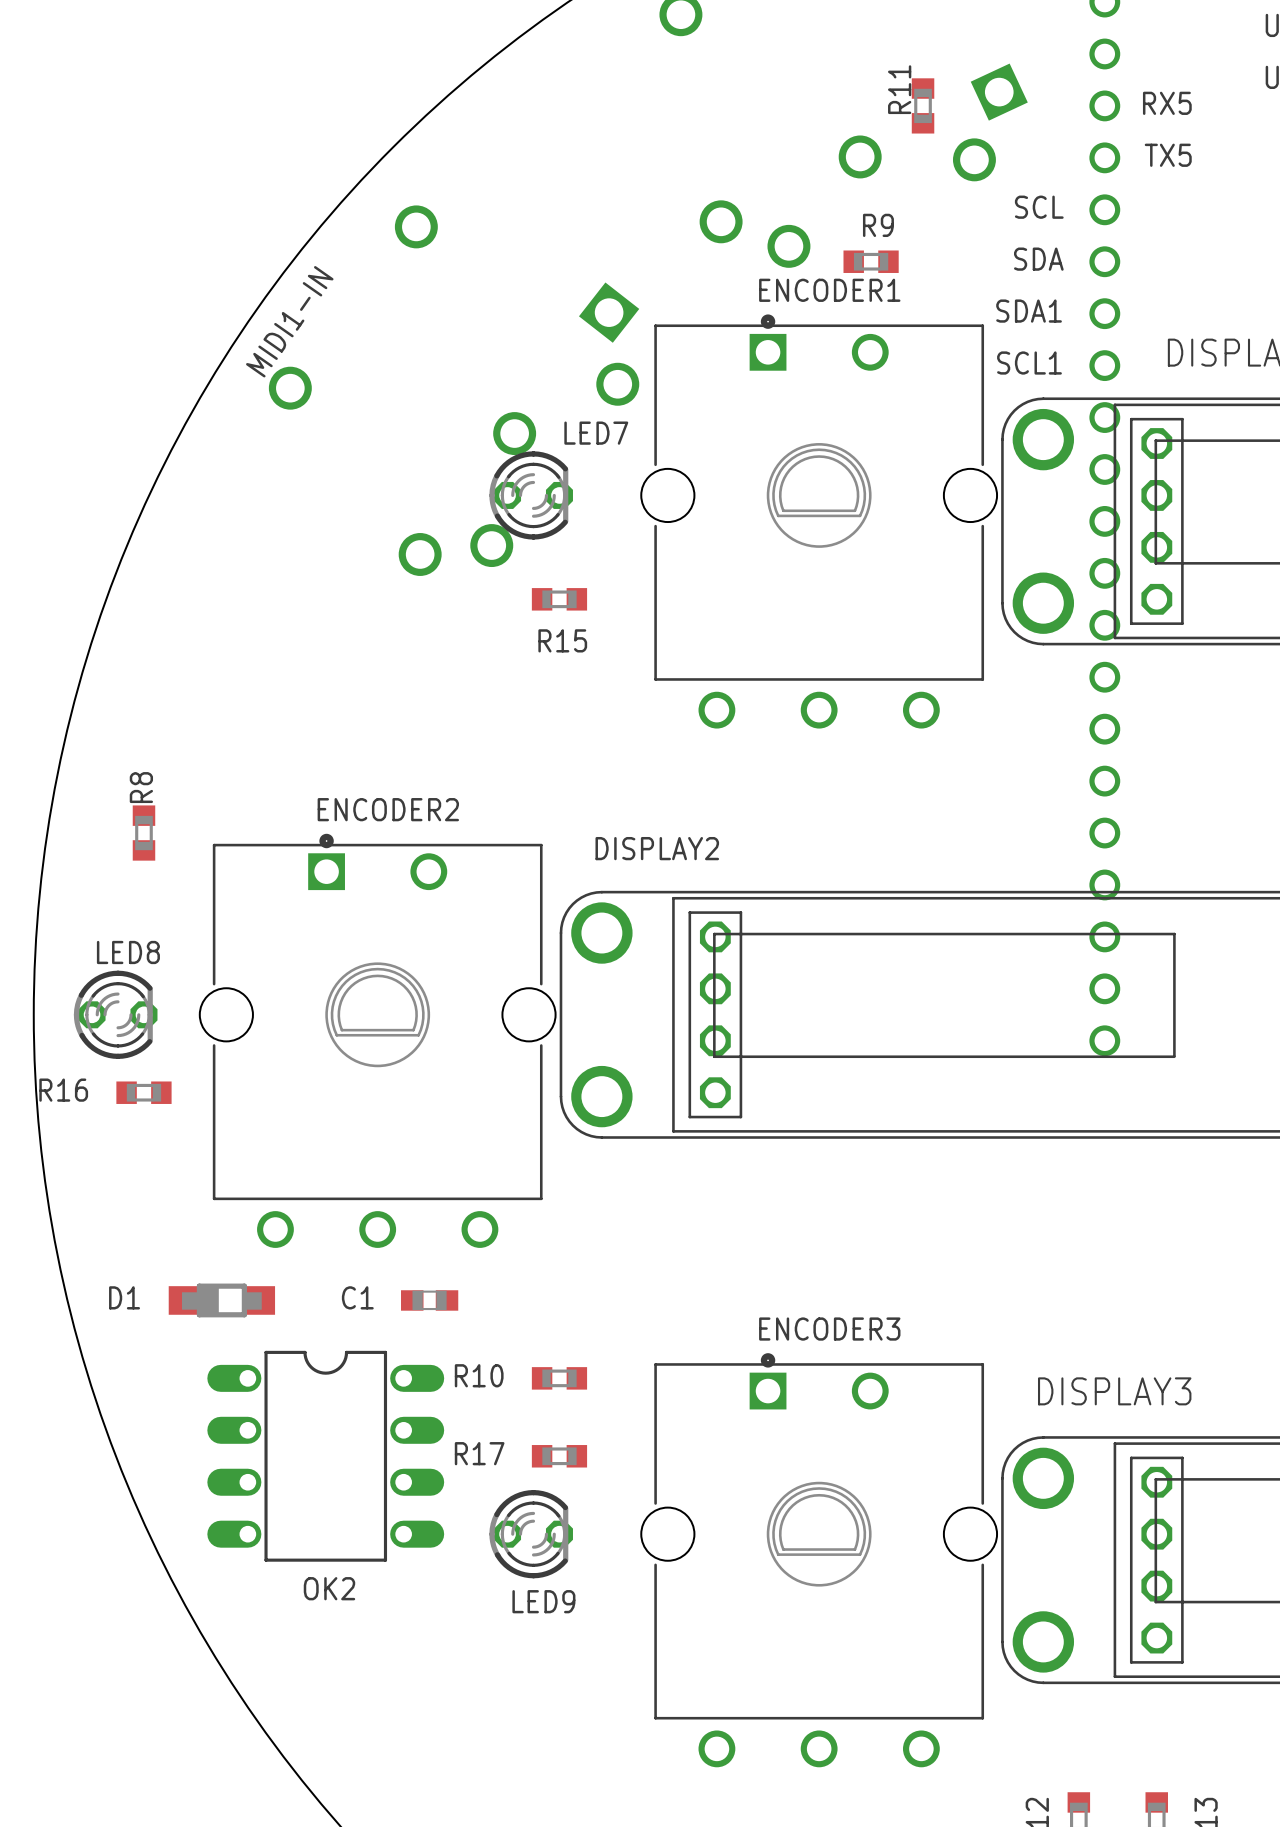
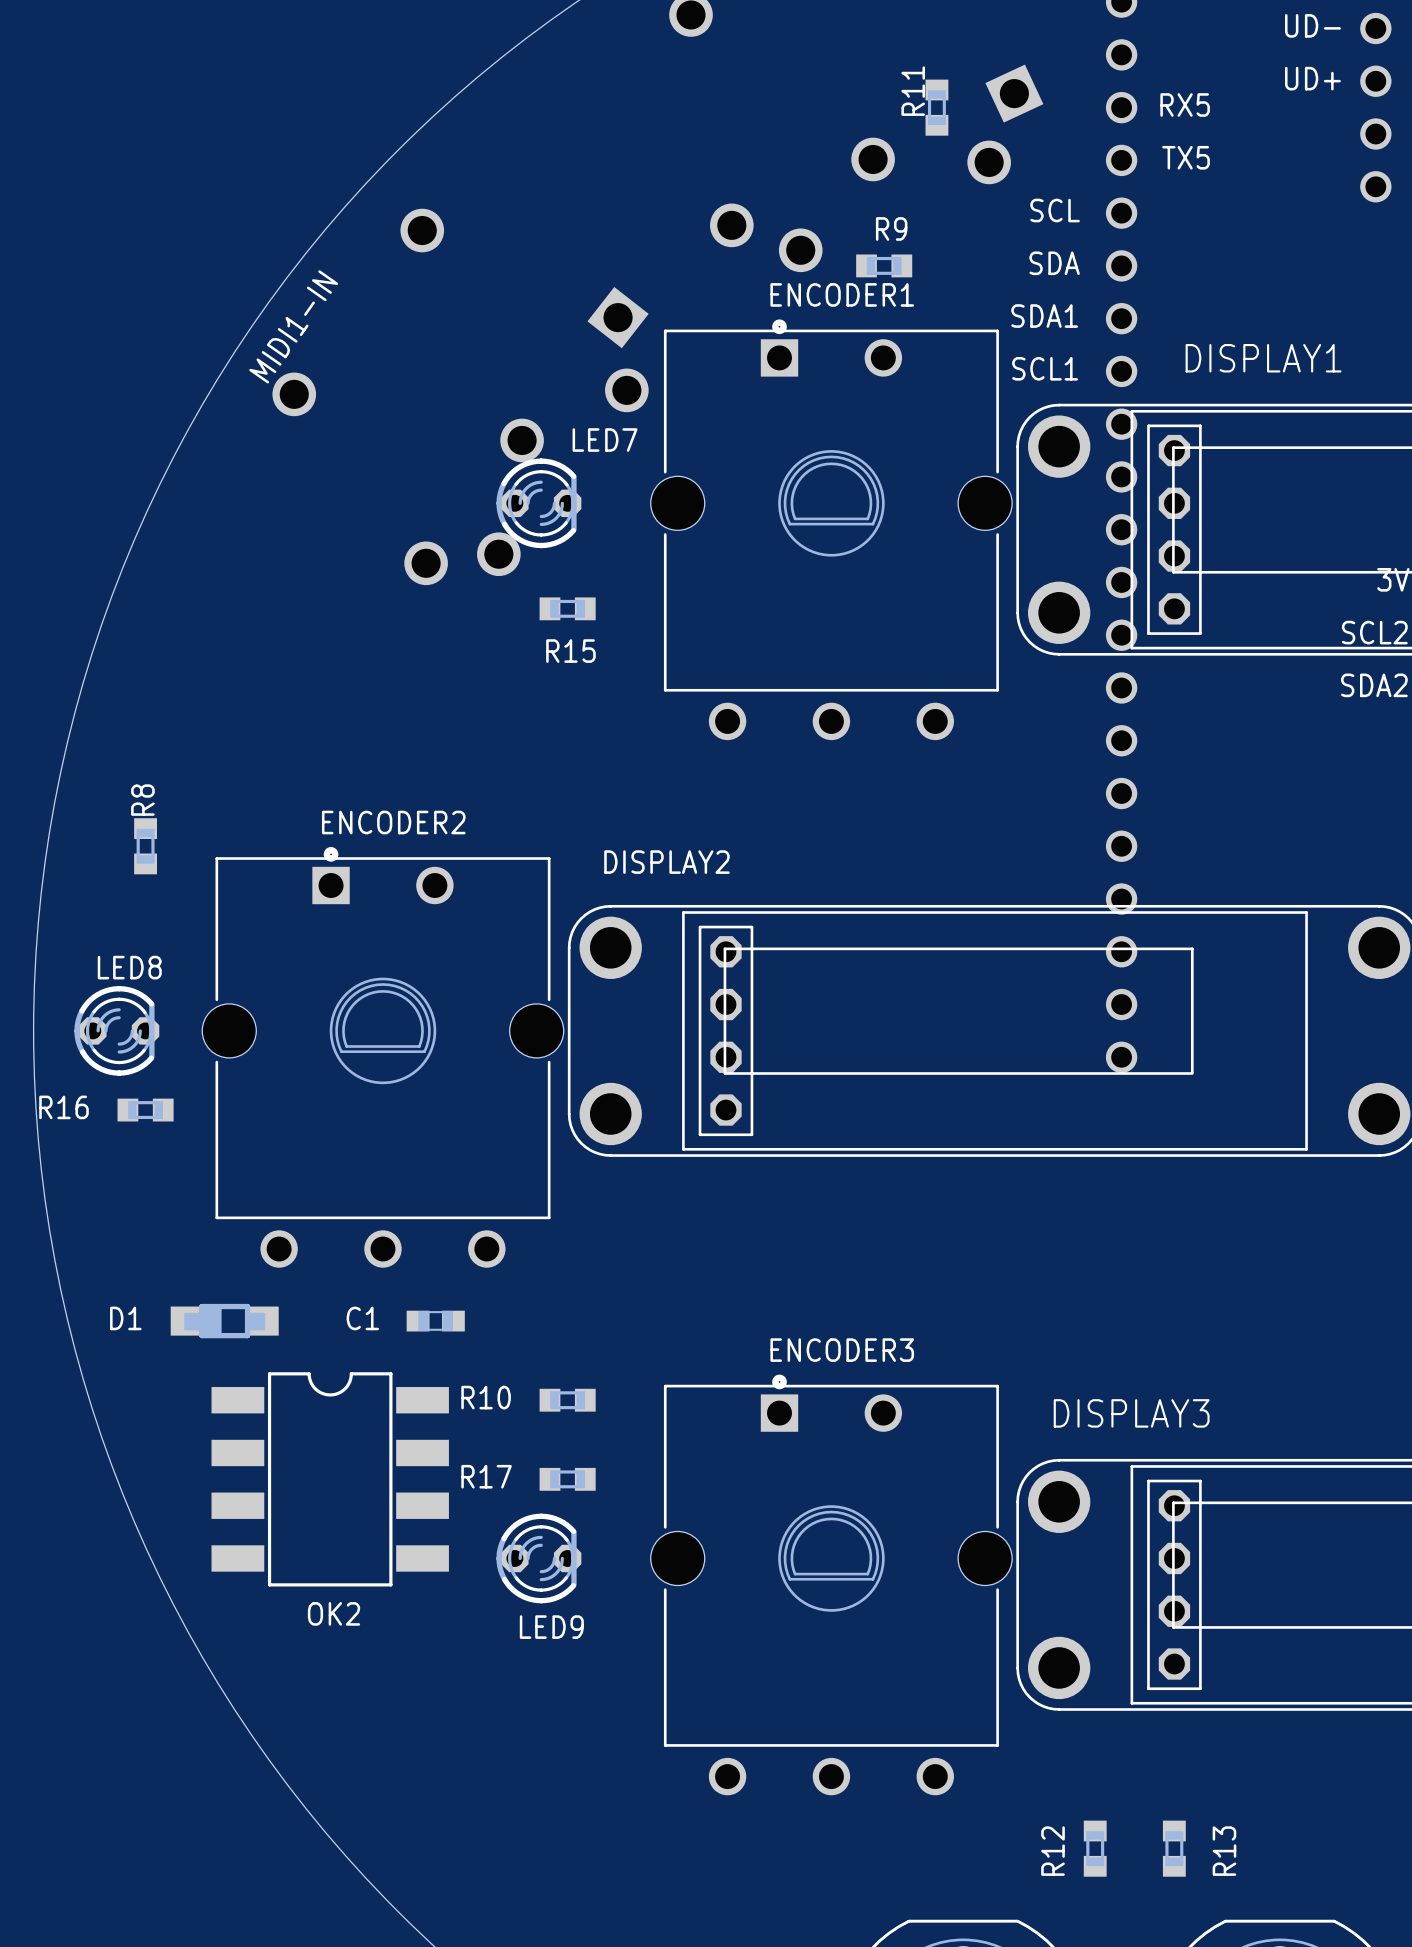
OK2 footprint: [207, 1350, 445, 1562] -> [211, 1372, 449, 1587]

